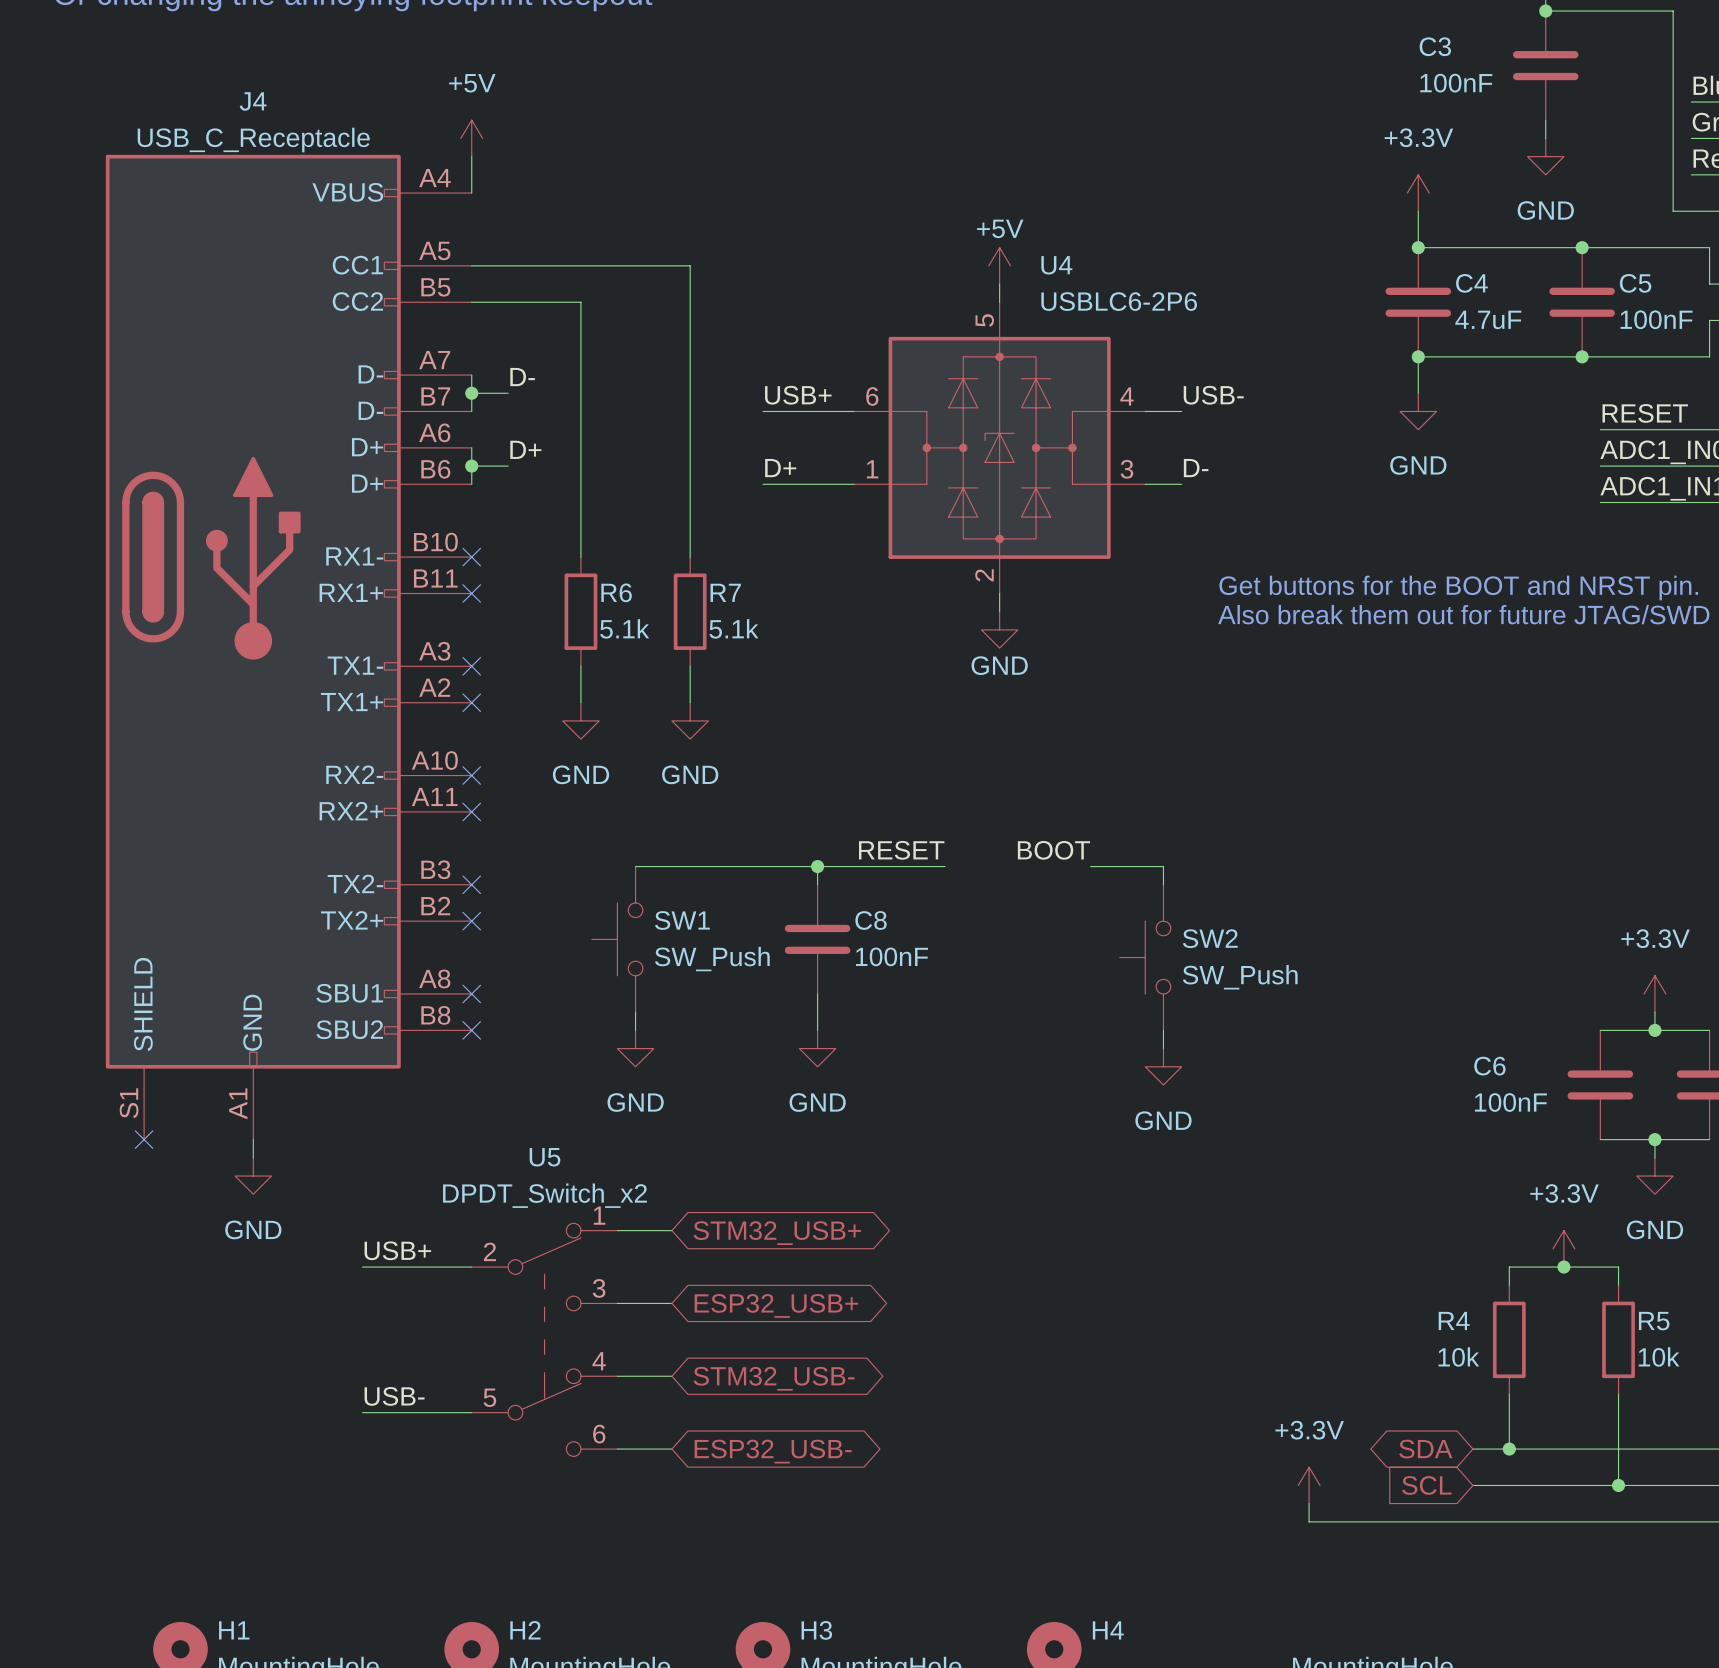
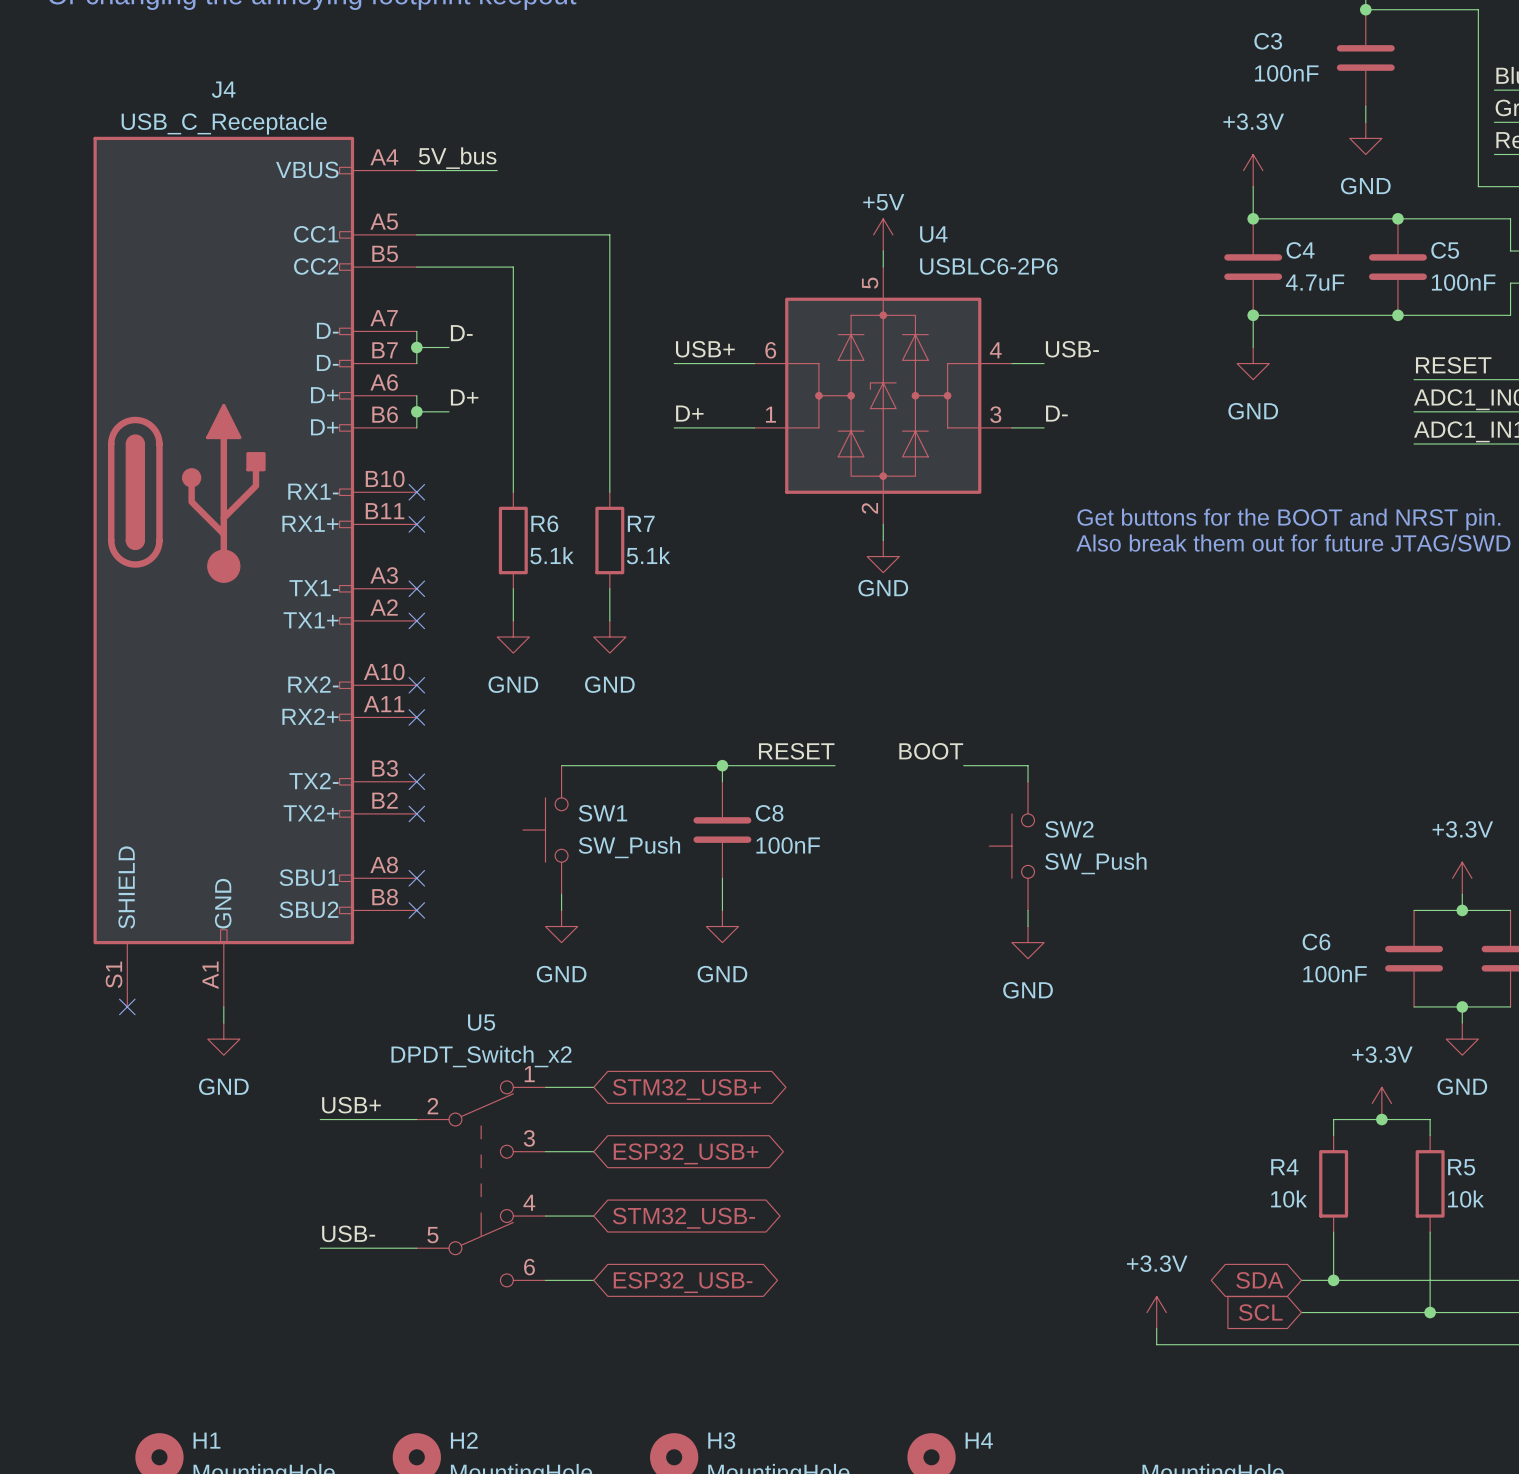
power symbol: +5V (471, 138) -> none
wire: (471, 156) (471, 193) -> (497, 170) (416, 170)
label: none -> 5V_bus (457, 158)

